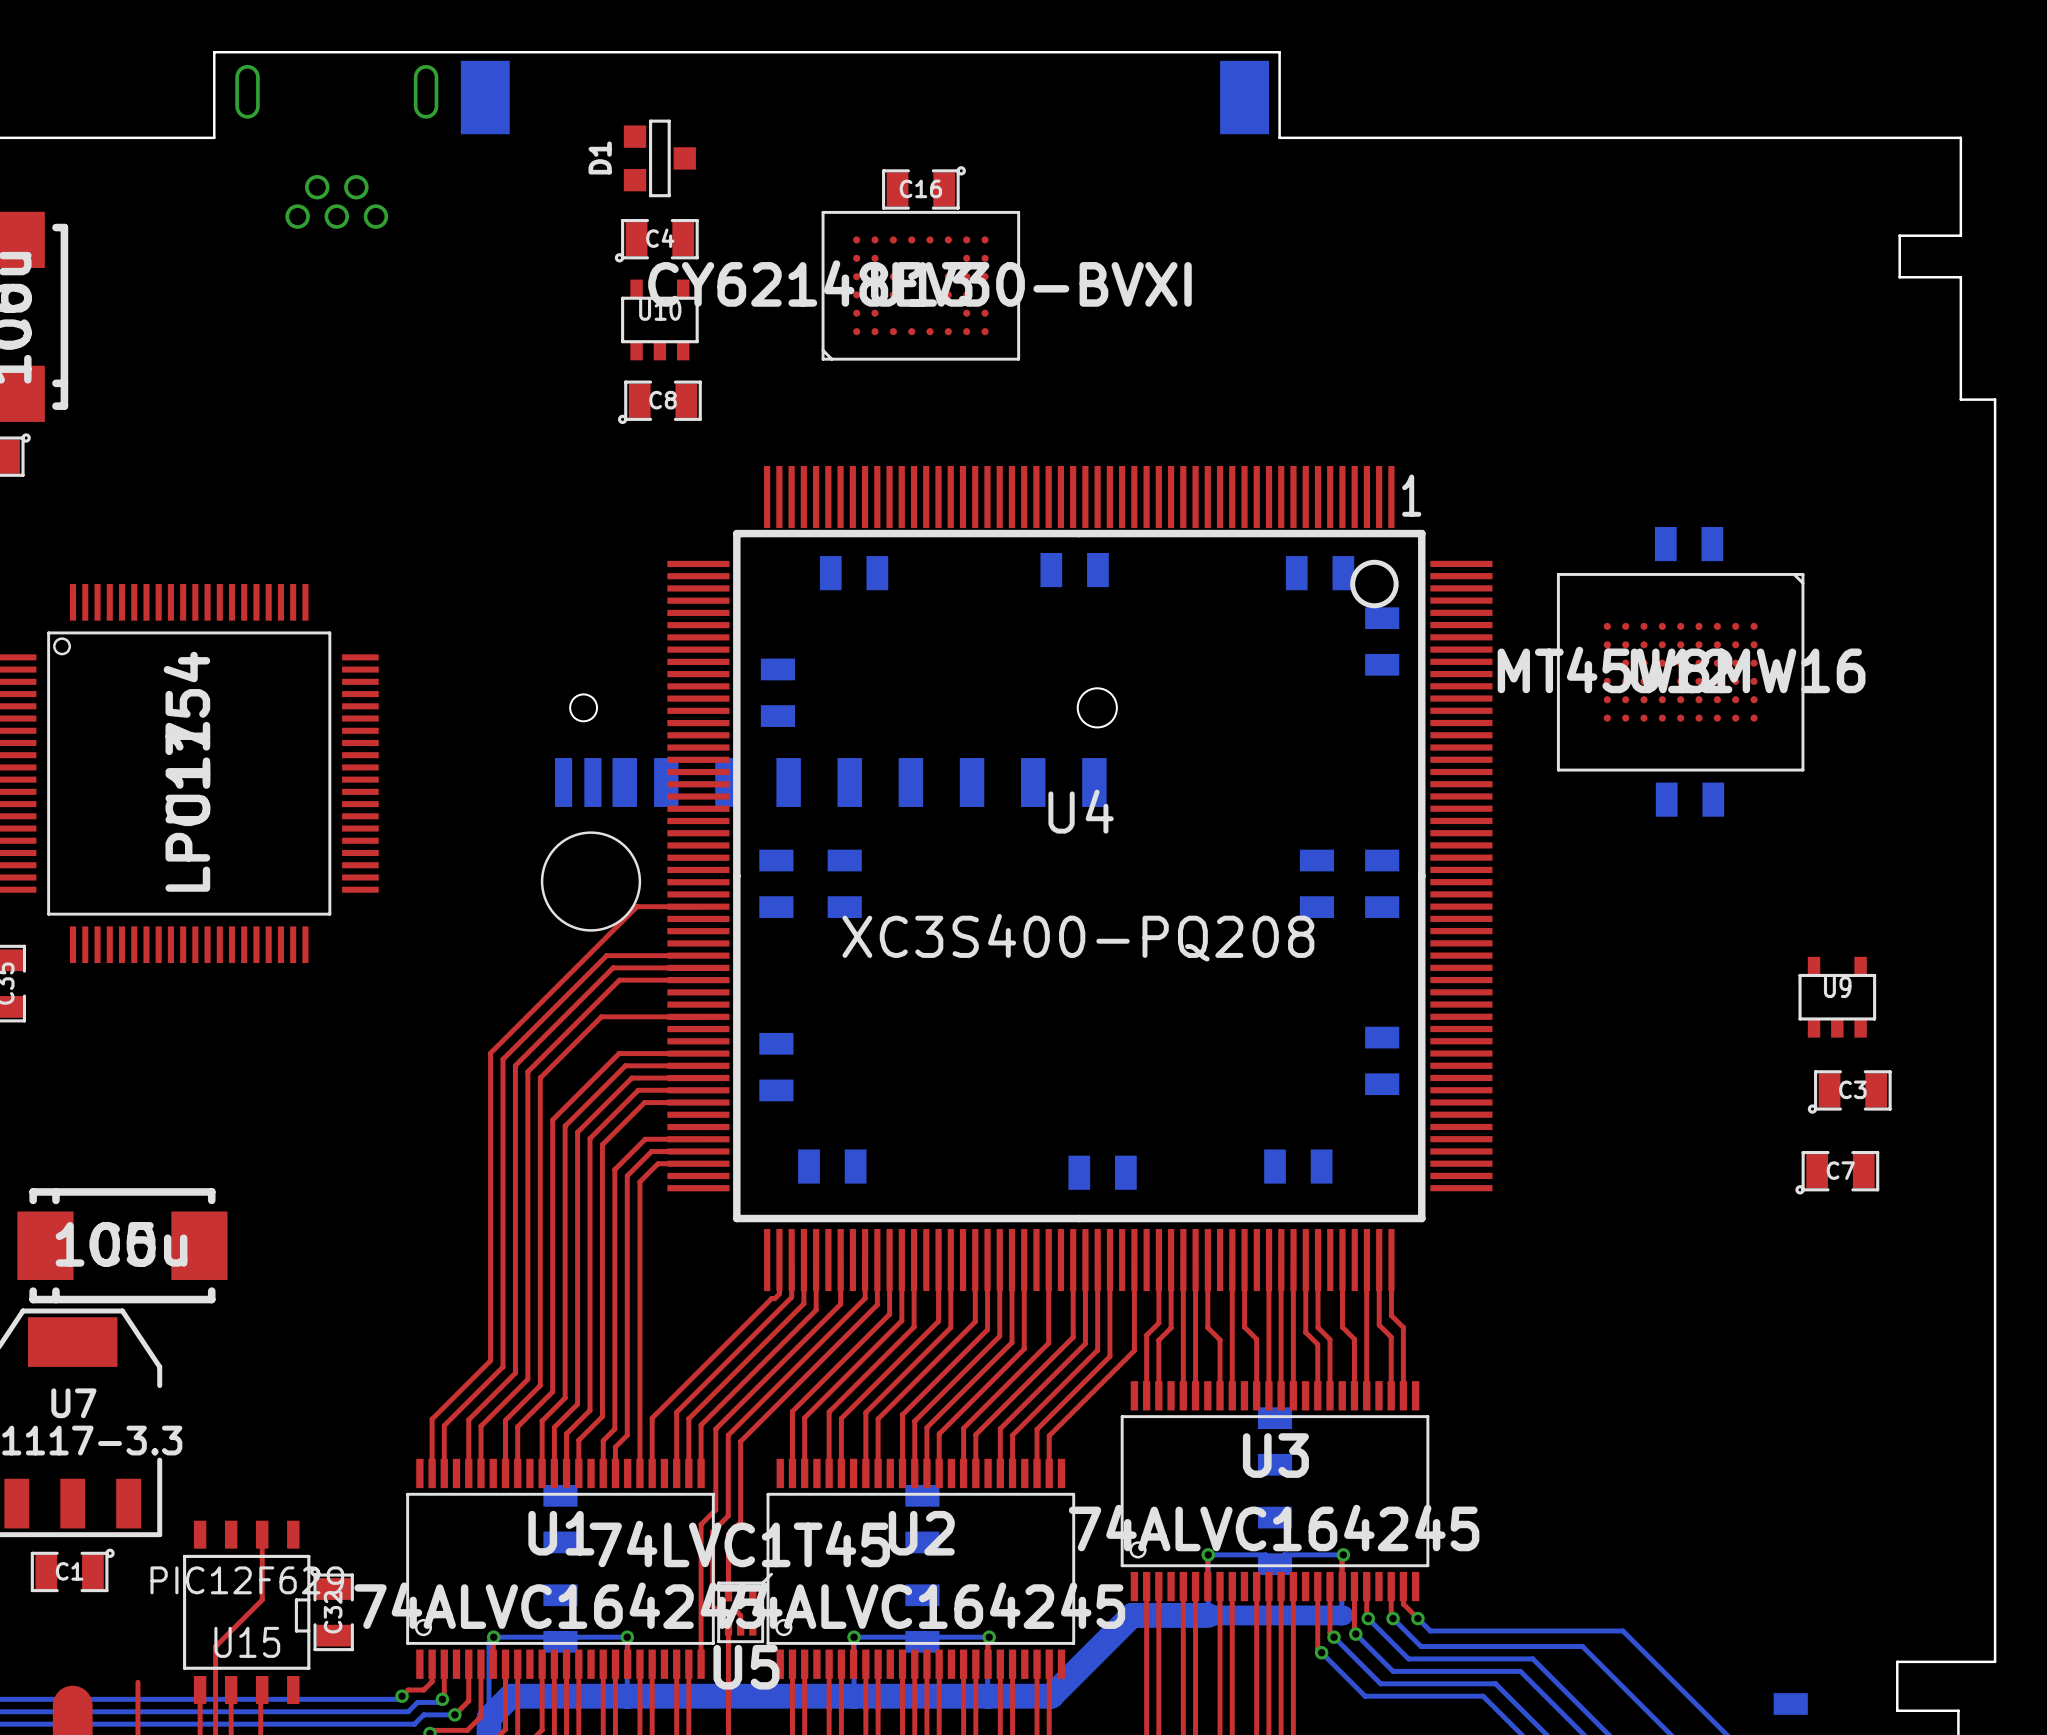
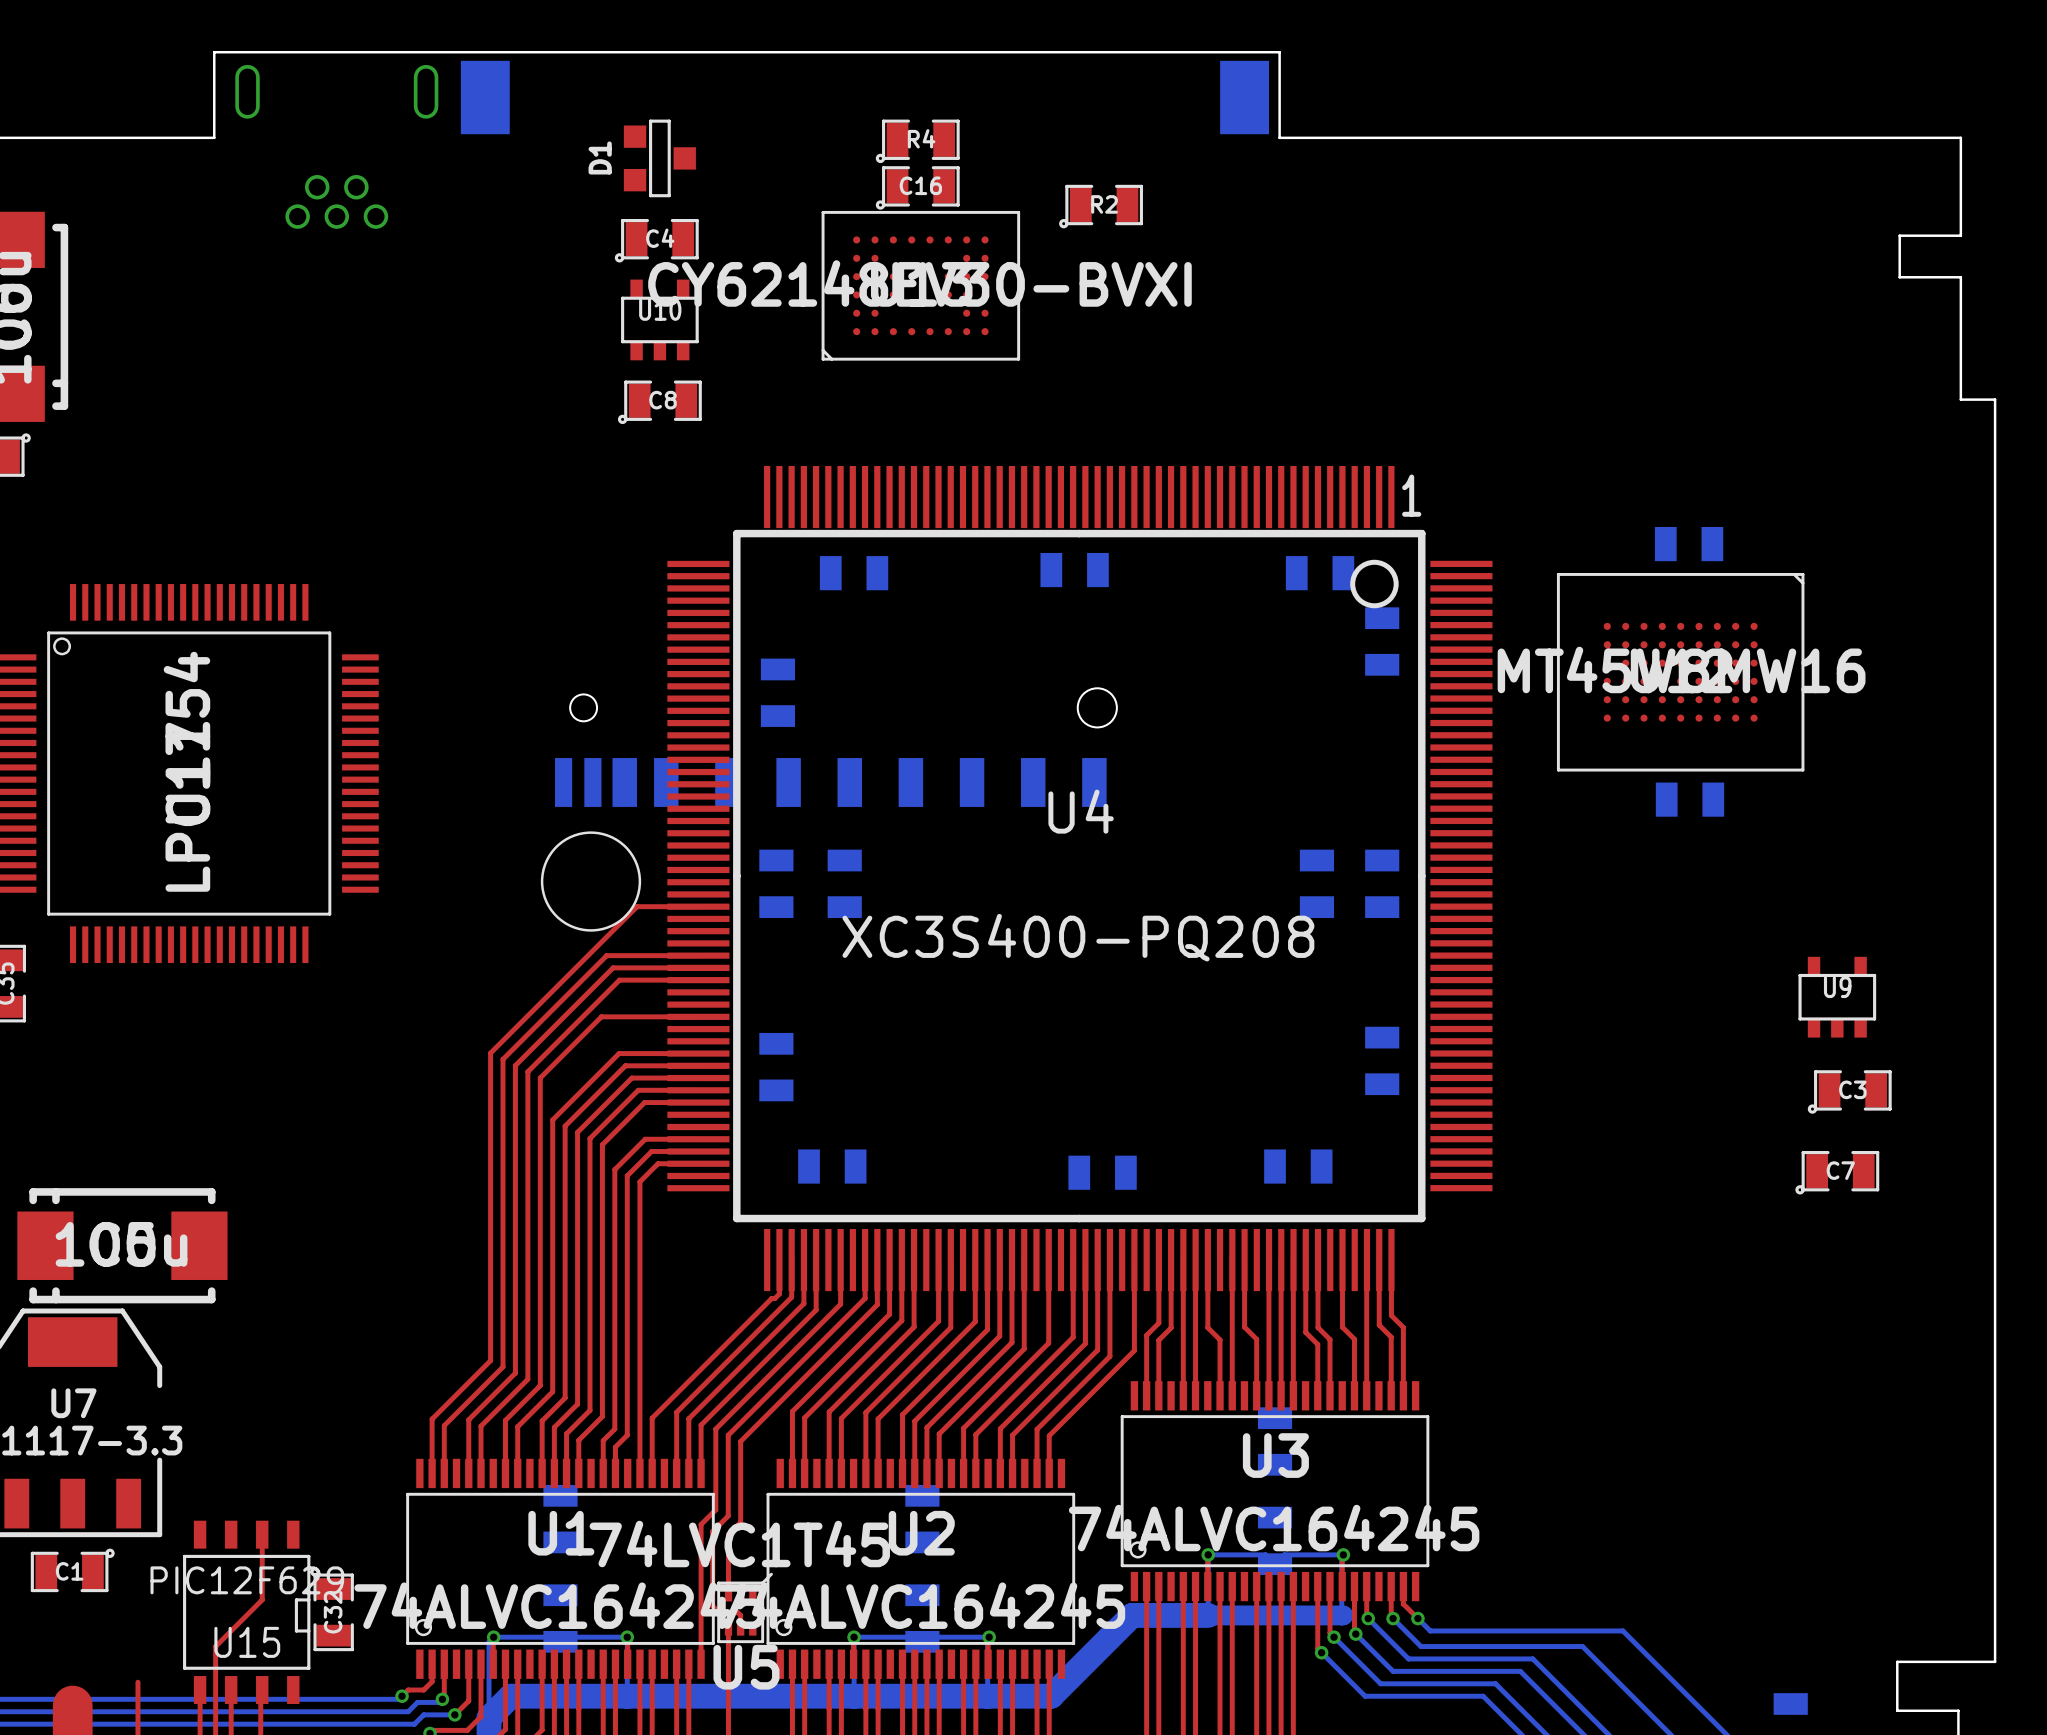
R4: none -> (917, 141)
C16 rotation: 0° (923, 187) -> 180° (917, 187)
R2: none -> (1101, 206)

